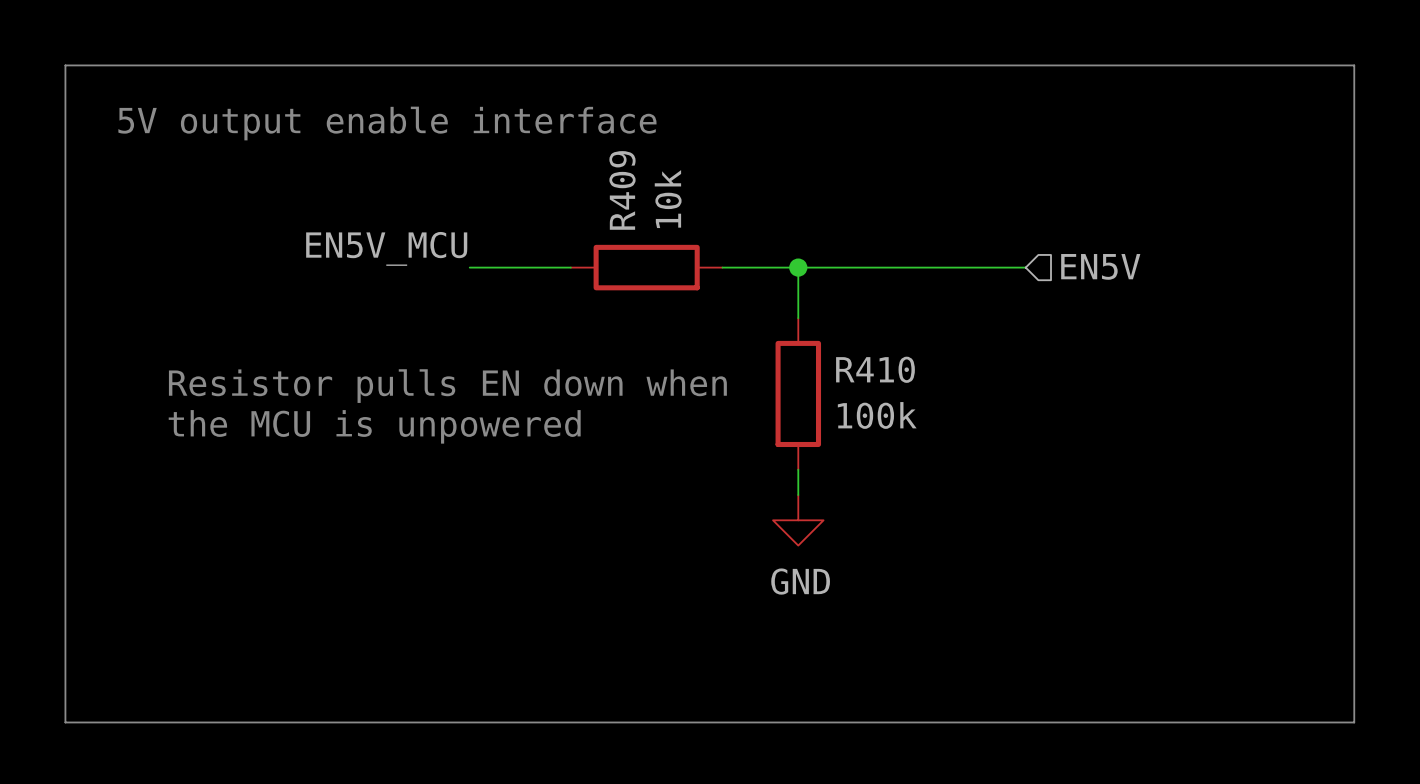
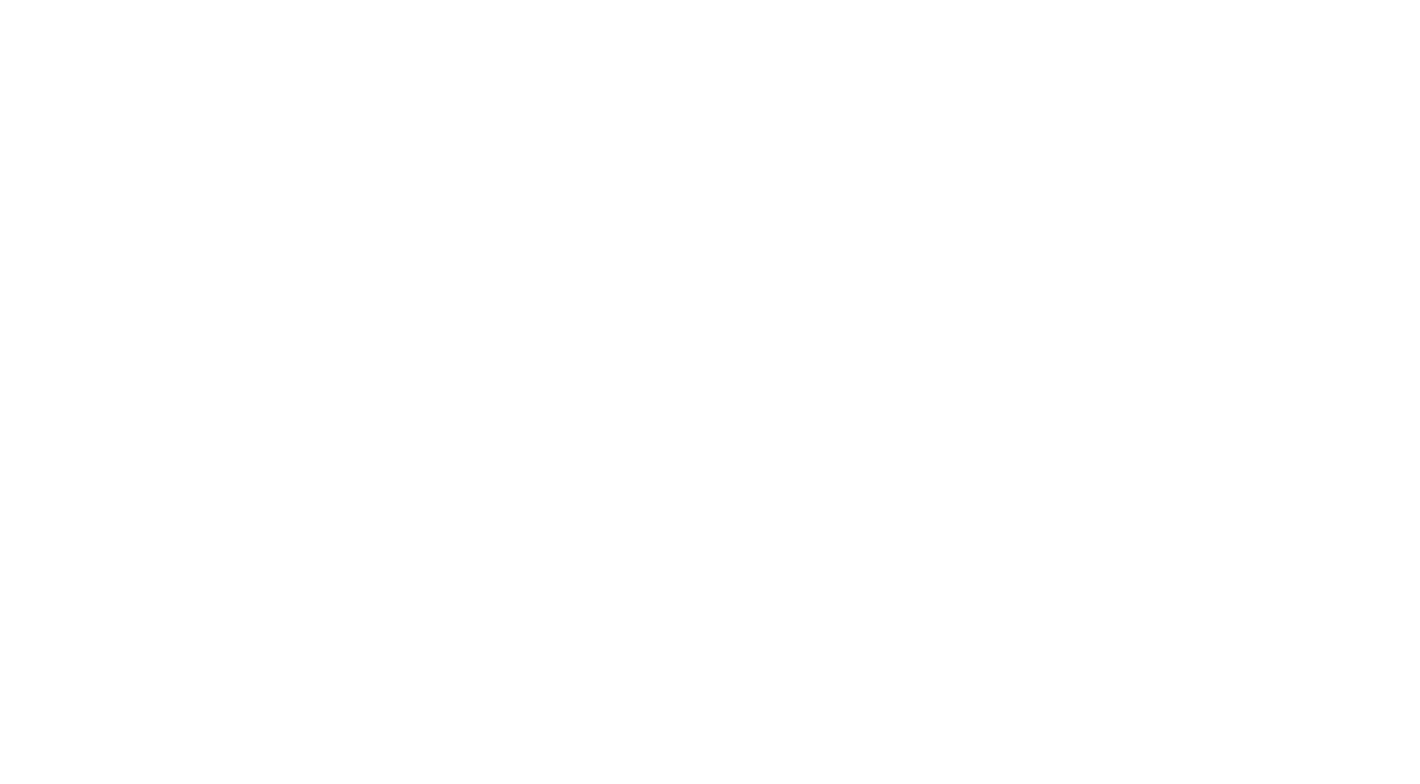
line: (65, 65) (1354, 65) (1354, 722) (65, 722) (65, 65) -> none
text: 5V output enable interface (387, 123) -> none
label: EN5V_MCU (386, 248) -> none
hierarchical label: EN5V (1100, 266) -> none
wire: (469, 267) (570, 267) -> none
R409: 10k (646, 267) -> none
wire: (722, 267) (1025, 267) -> none
wire: (798, 267) (798, 318) -> none
junction: (798, 267) -> none
text: Resistor pulls EN down when (447, 386) -> none
R410: 100k (798, 393) -> none
text: the MCU is unpowered (374, 426) -> none
wire: (798, 469) (798, 495) -> none
power symbol: GND (798, 520) -> none

